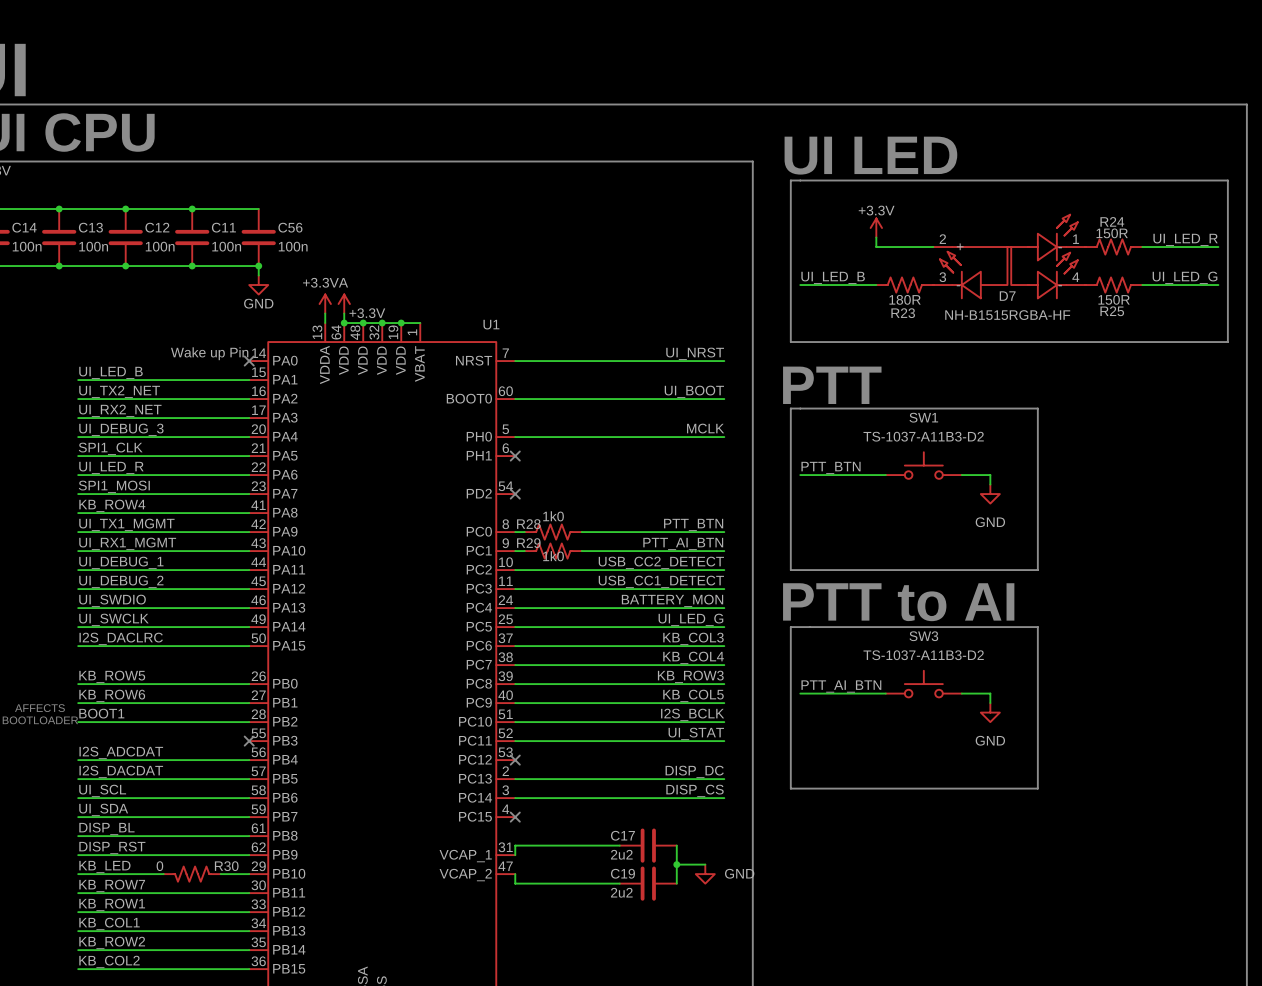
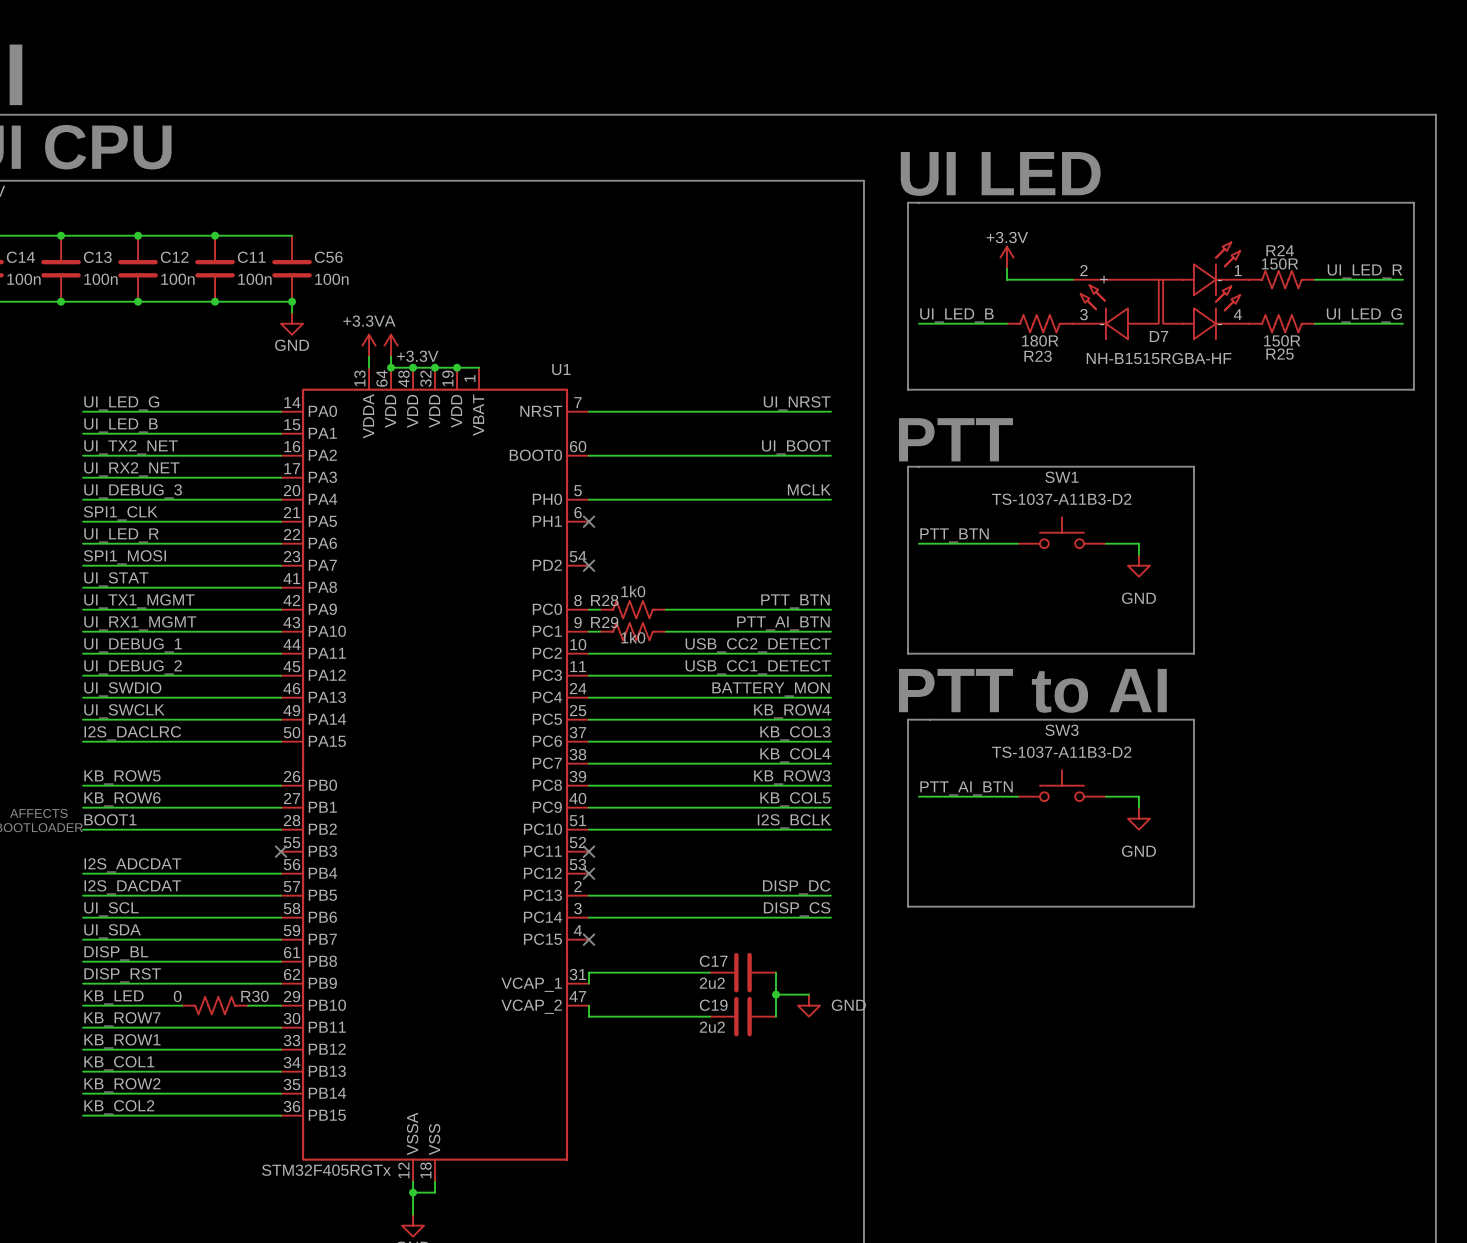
label: none -> UI_LED_G (121, 403)
label: Wake up Pin (209, 353) -> none
wire: none -> (83, 411) (281, 411)
no-connect mark: (249, 361) -> none
label: KB_ROW4 (112, 505) -> UI_STAT (116, 579)
label: UI_LED_G (690, 619) -> KB_ROW4 (792, 711)
label: UI_STAT (696, 733) -> none
wire: (515, 741) (724, 741) -> none
no-connect mark: none -> (589, 851)

